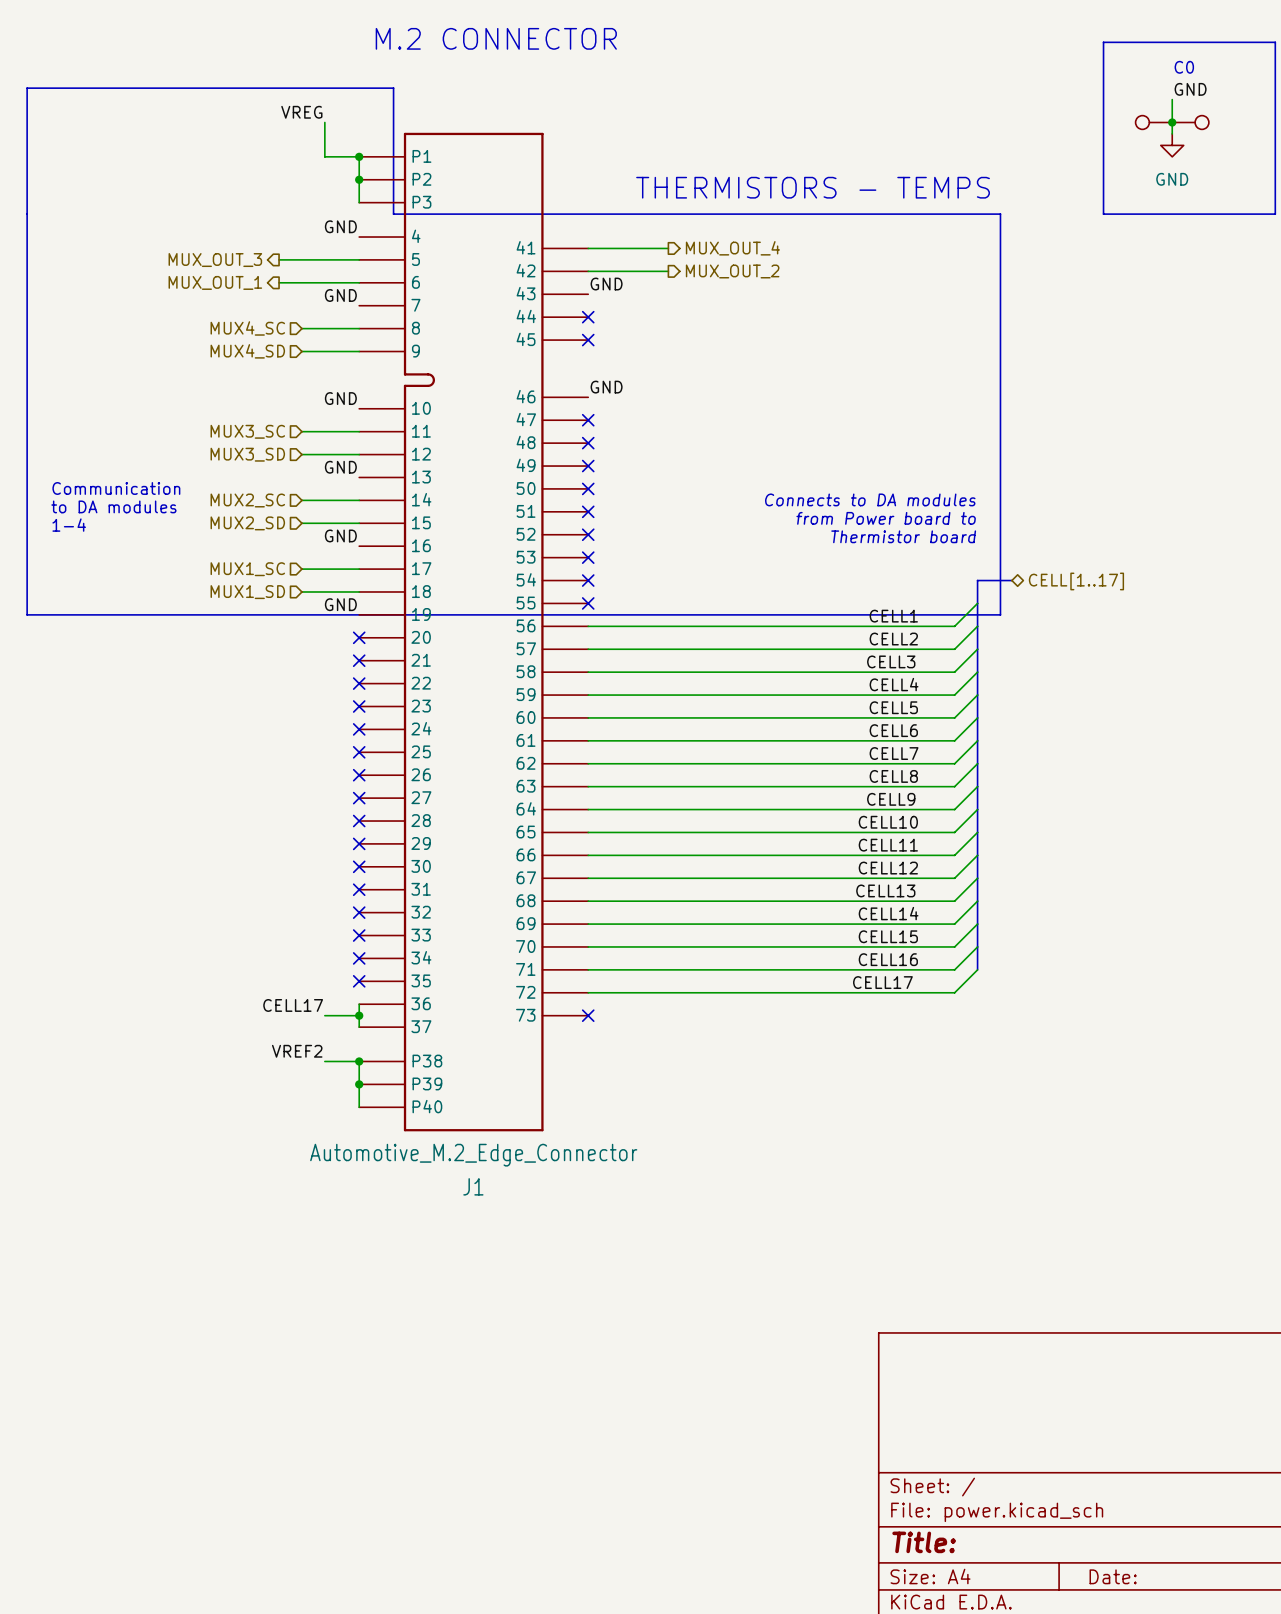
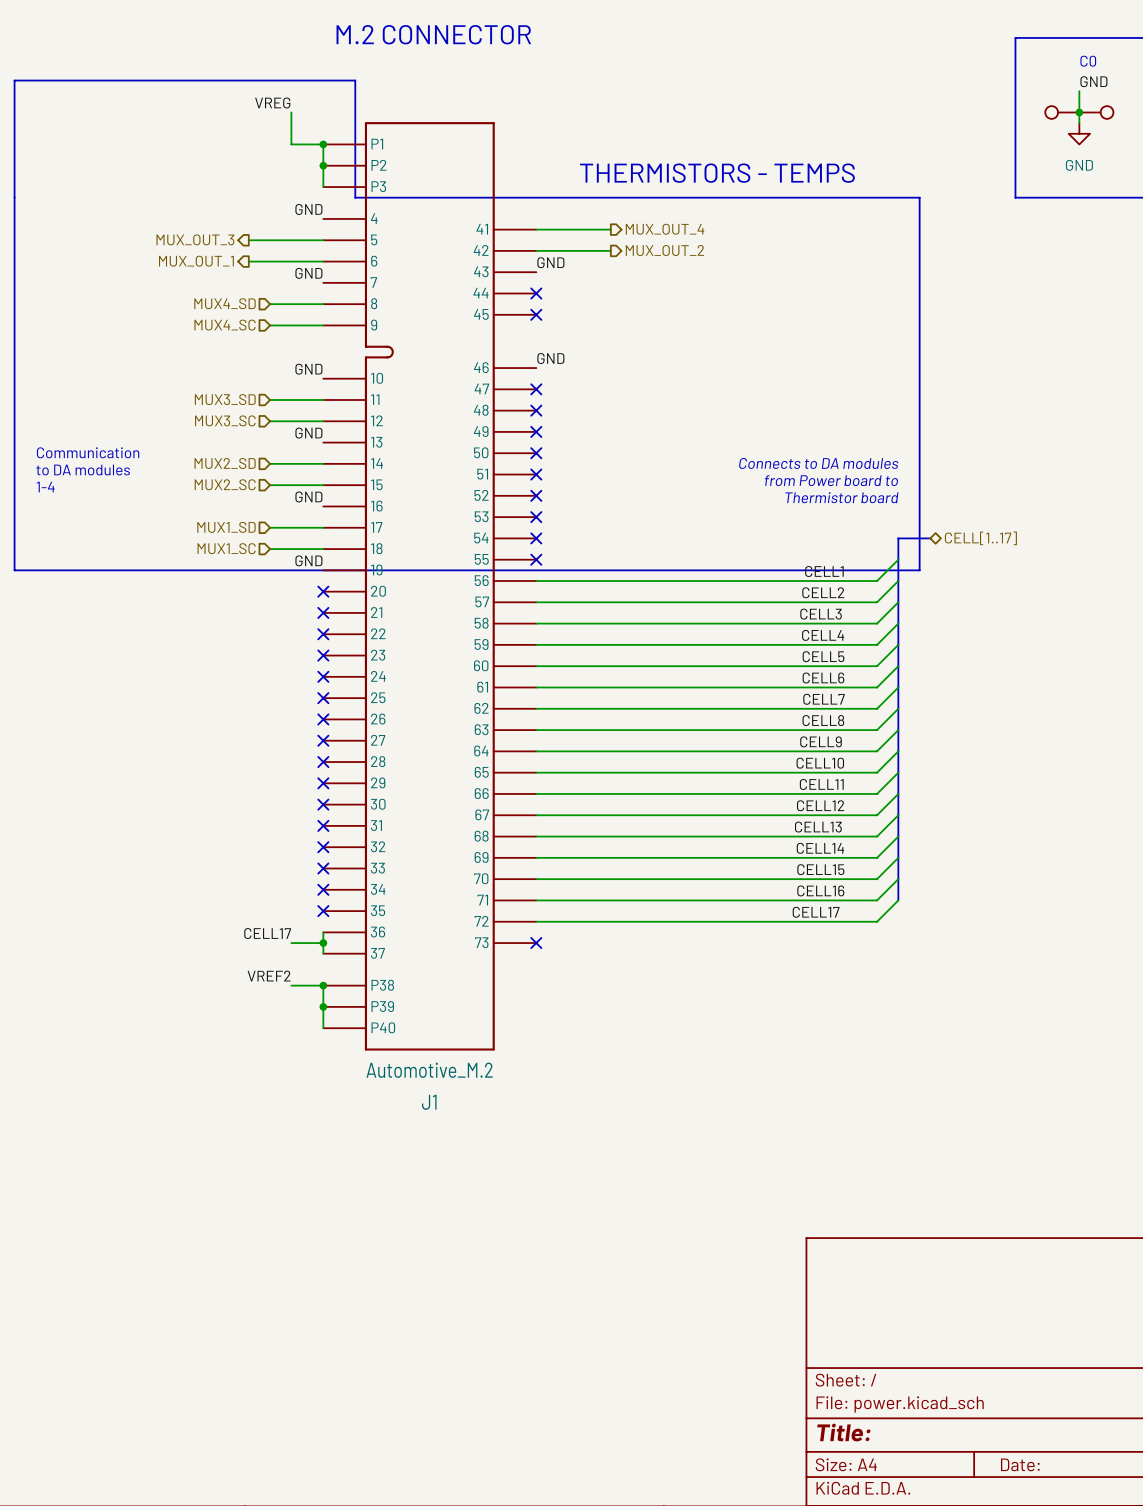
hierarchical label: MUX4_SC (247, 328) -> MUX4_SD (224, 303)
hierarchical label: MUX4_SD (247, 351) -> MUX4_SC (225, 325)
hierarchical label: MUX3_SC (247, 431) -> MUX3_SD (225, 399)
hierarchical label: MUX3_SD (247, 454) -> MUX3_SC (225, 420)
hierarchical label: MUX2_SC (247, 500) -> MUX2_SD (225, 463)
hierarchical label: MUX2_SD (247, 523) -> MUX2_SC (225, 484)
hierarchical label: MUX1_SC (247, 569) -> MUX1_SD (226, 527)
hierarchical label: MUX1_SD (247, 592) -> MUX1_SC (226, 548)
J1 value: Automotive_M.2_Edge_Connector (473, 1155) -> Automotive_M.2 (429, 1070)

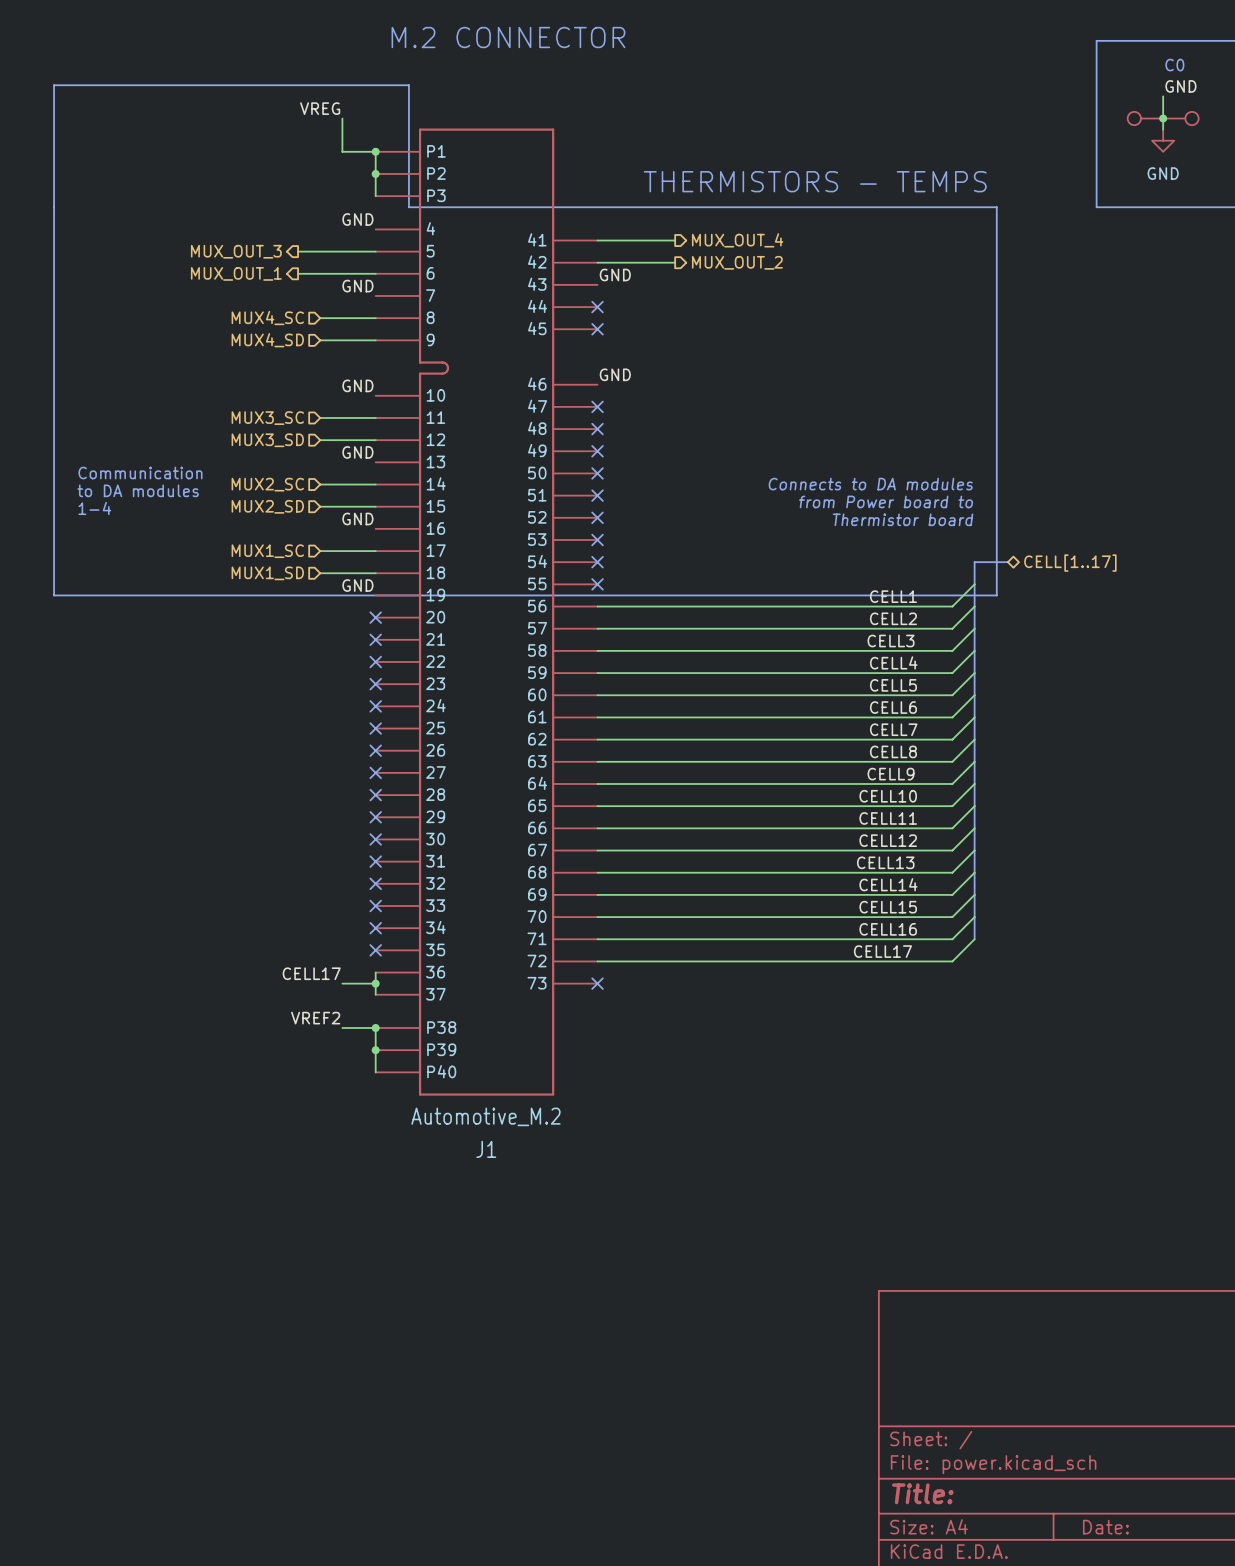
hierarchical label: MUX4_SD (224, 303) -> MUX4_SC (267, 318)
hierarchical label: MUX4_SC (225, 325) -> MUX4_SD (267, 340)
hierarchical label: MUX3_SD (225, 399) -> MUX3_SC (267, 418)
hierarchical label: MUX3_SC (225, 420) -> MUX3_SD (267, 440)
hierarchical label: MUX2_SD (225, 463) -> MUX2_SC (267, 484)
hierarchical label: MUX2_SC (225, 484) -> MUX2_SD (267, 506)
hierarchical label: MUX1_SD (226, 527) -> MUX1_SC (267, 551)
hierarchical label: MUX1_SC (226, 548) -> MUX1_SD (267, 573)

